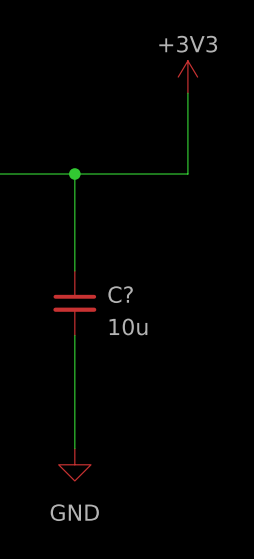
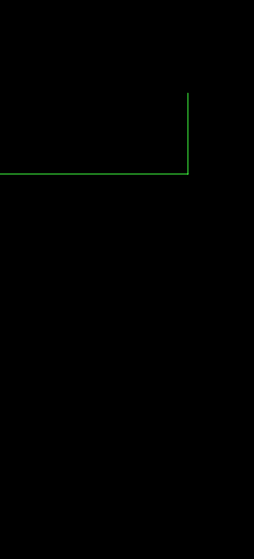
power symbol: +3V3 (187, 77) -> none
wire: (74, 174) (74, 270) -> none
junction: (74, 174) -> none
C?: 10u (74, 303) -> none
wire: (74, 335) (74, 448) -> none
power symbol: GND (74, 464) -> none

